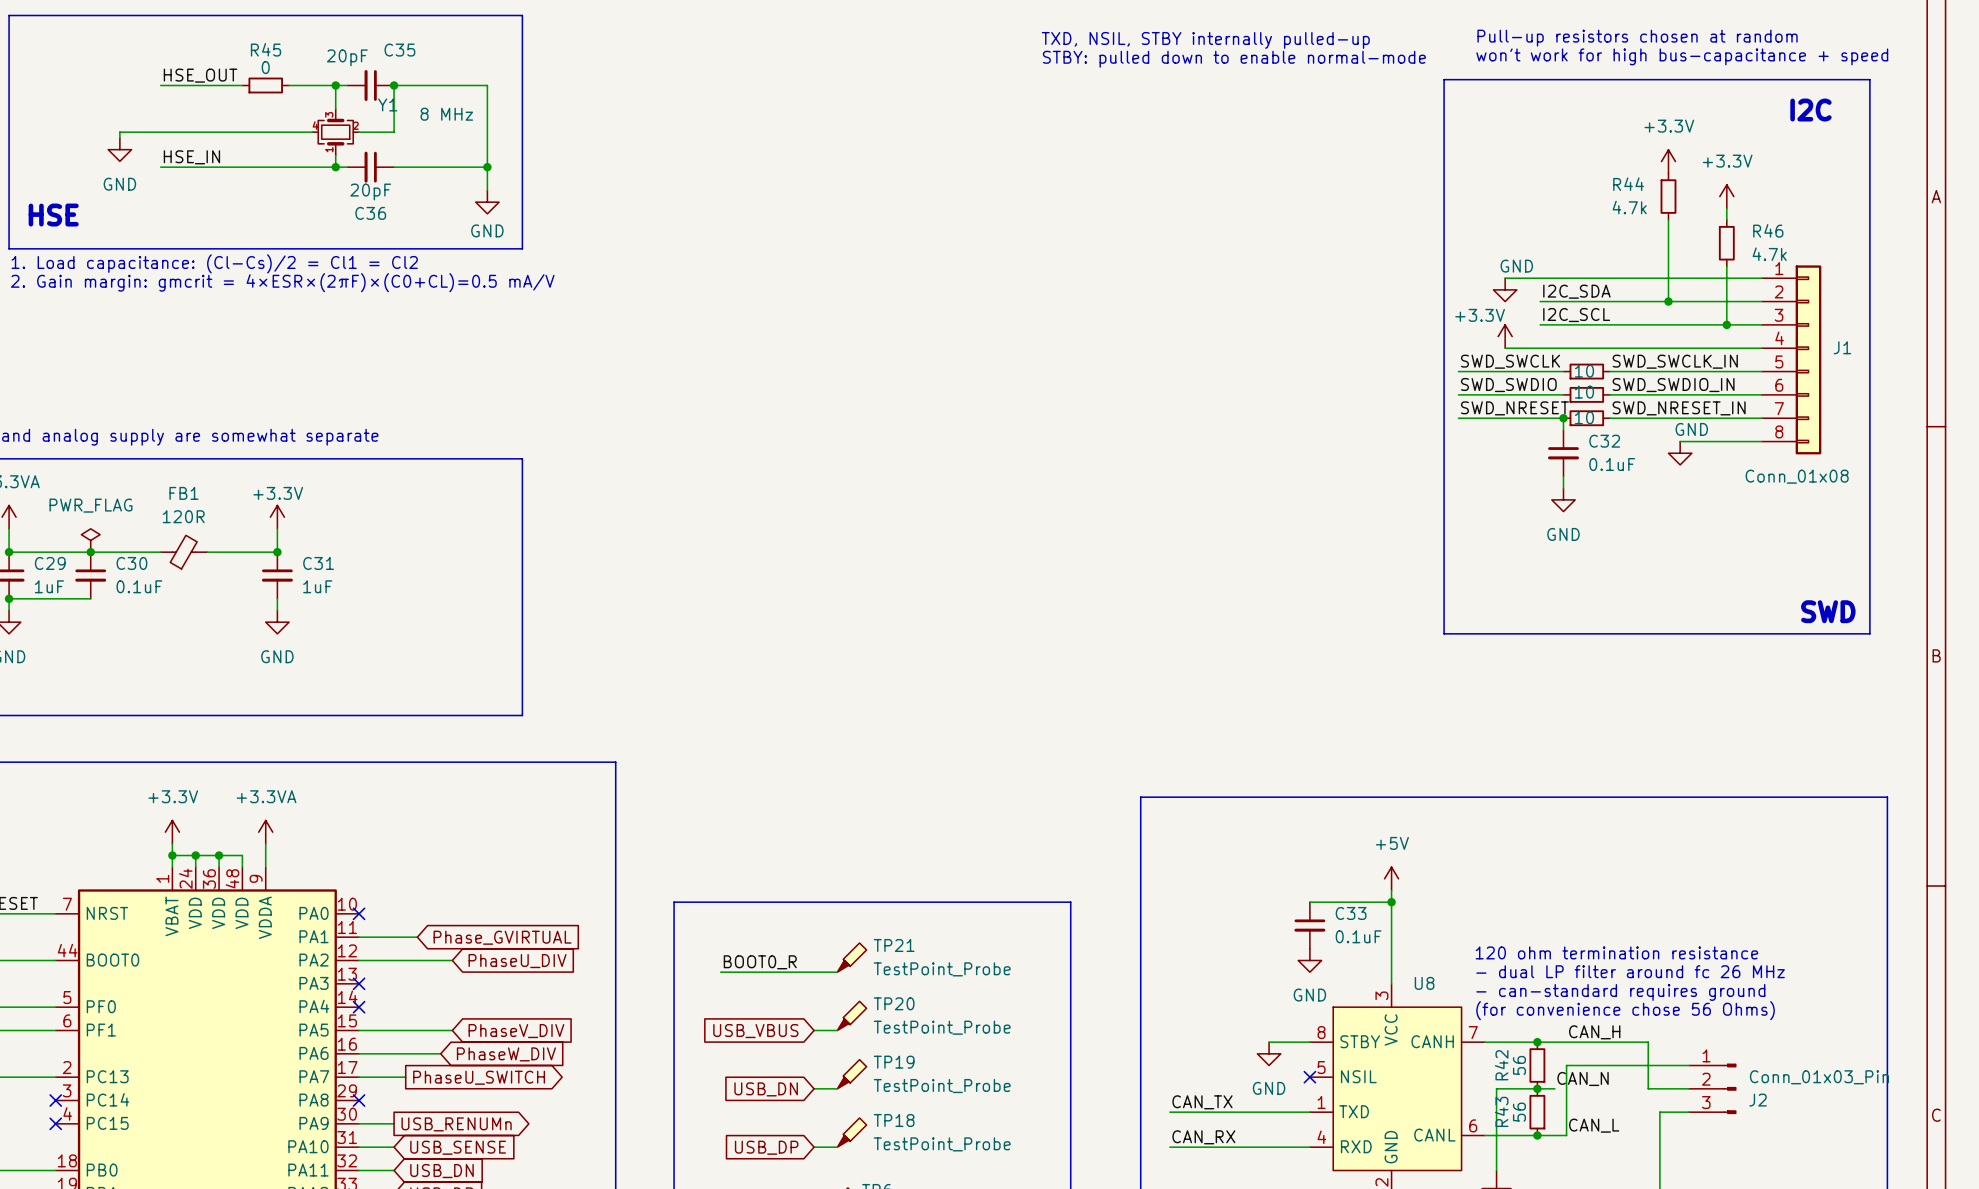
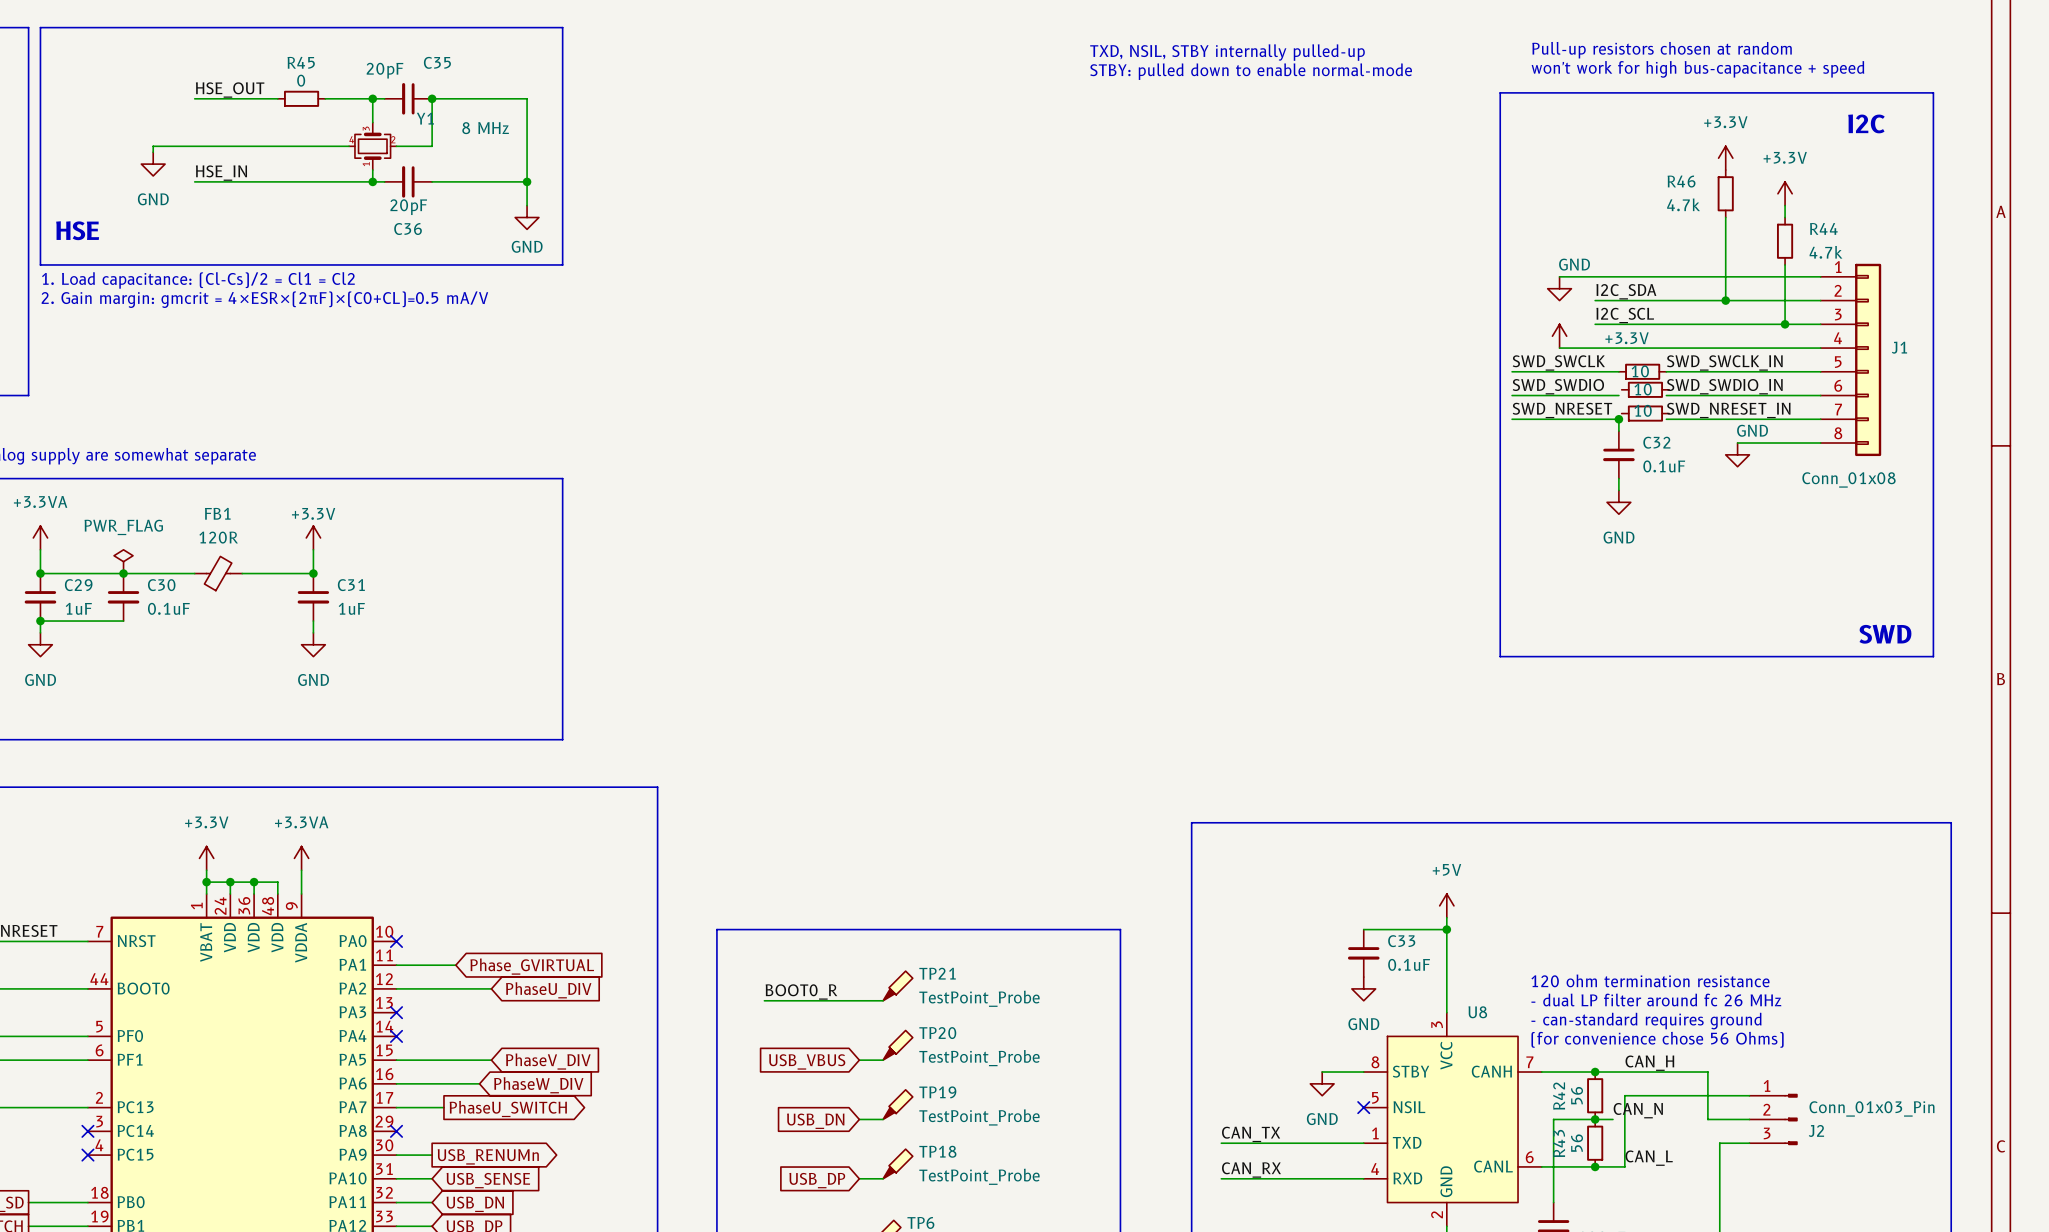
power symbol position: +3.3V (1668, 161) -> +3.3V (1725, 158)
R44 name position: R44 (1628, 184) -> R44 (1823, 228)
R44 position: (1668, 196) -> (1785, 241)
power symbol position: +3.3V (1726, 196) -> +3.3V (1785, 193)
R44 value position: 4.7k (1629, 207) -> 4.7k (1825, 252)
wire: (1726, 208) (1726, 219) -> (1785, 205) (1785, 217)
wire: (1668, 219) (1668, 301) -> (1725, 217) (1725, 300)
R46 name position: R46 (1768, 230) -> R46 (1681, 181)
R46 position: (1726, 243) -> (1725, 193)
R46 value position: 4.7k (1769, 254) -> 4.7k (1683, 204)
wire: (1726, 266) (1726, 324) -> (1785, 264) (1785, 324)
wire: (1505, 278) (1761, 278) -> (1559, 276) (1820, 276)
power symbol position: GND (1505, 289) -> GND (1559, 288)
label position: I2C_SDA (1576, 291) -> I2C_SDA (1626, 291)
wire: (1540, 301) (1761, 301) -> (1595, 300) (1820, 300)
junction position: (1668, 301) -> (1725, 300)
power symbol text position: +3.3V (1480, 315) -> +3.3V (1627, 338)
label position: I2C_SCL (1576, 315) -> I2C_SCL (1625, 315)
wire: (1540, 324) (1761, 324) -> (1595, 324) (1820, 324)
junction position: (1726, 324) -> (1785, 324)
power symbol position: +3.3V (1505, 336) -> +3.3V (1559, 336)
wire: (1505, 348) (1761, 348) -> (1559, 348) (1820, 348)
J1 position: (1791, 359) -> (1850, 359)
label position: SWD_SWCLK (1510, 361) -> SWD_SWCLK (1558, 362)
label position: SWD_SWCLK_IN (1675, 361) -> SWD_SWCLK_IN (1724, 362)
wire: (1458, 371) (1563, 371) -> (1512, 371) (1618, 371)
wire: (1610, 371) (1761, 371) -> (1666, 371) (1820, 371)
label position: SWD_SWDIO (1508, 385) -> SWD_SWDIO (1558, 386)
label position: SWD_SWDIO_IN (1673, 385) -> SWD_SWDIO_IN (1724, 386)
wire: (1458, 394) (1563, 394) -> (1512, 395) (1618, 395)
wire: (1610, 394) (1761, 394) -> (1666, 395) (1820, 395)
label position: SWD_NRESET (1514, 408) -> SWD_NRESET (1562, 410)
label position: SWD_NRESET_IN (1679, 408) -> SWD_NRESET_IN (1728, 410)
wire: (1458, 418) (1563, 418) (1563, 429) -> (1512, 419) (1618, 419) (1618, 431)
junction position: (1563, 418) -> (1618, 419)
part position: (1586, 418) -> (1642, 371)
wire: (1610, 418) (1761, 418) -> (1666, 419) (1820, 419)
wire: (1680, 441) (1761, 441) -> (1737, 443) (1820, 443)
C32 position: (1563, 453) -> (1618, 454)
power symbol position: GND (1680, 453) -> GND (1737, 454)
wire: (1563, 476) (1563, 488) -> (1618, 478) (1618, 490)
power symbol position: GND (1563, 499) -> GND (1618, 502)

